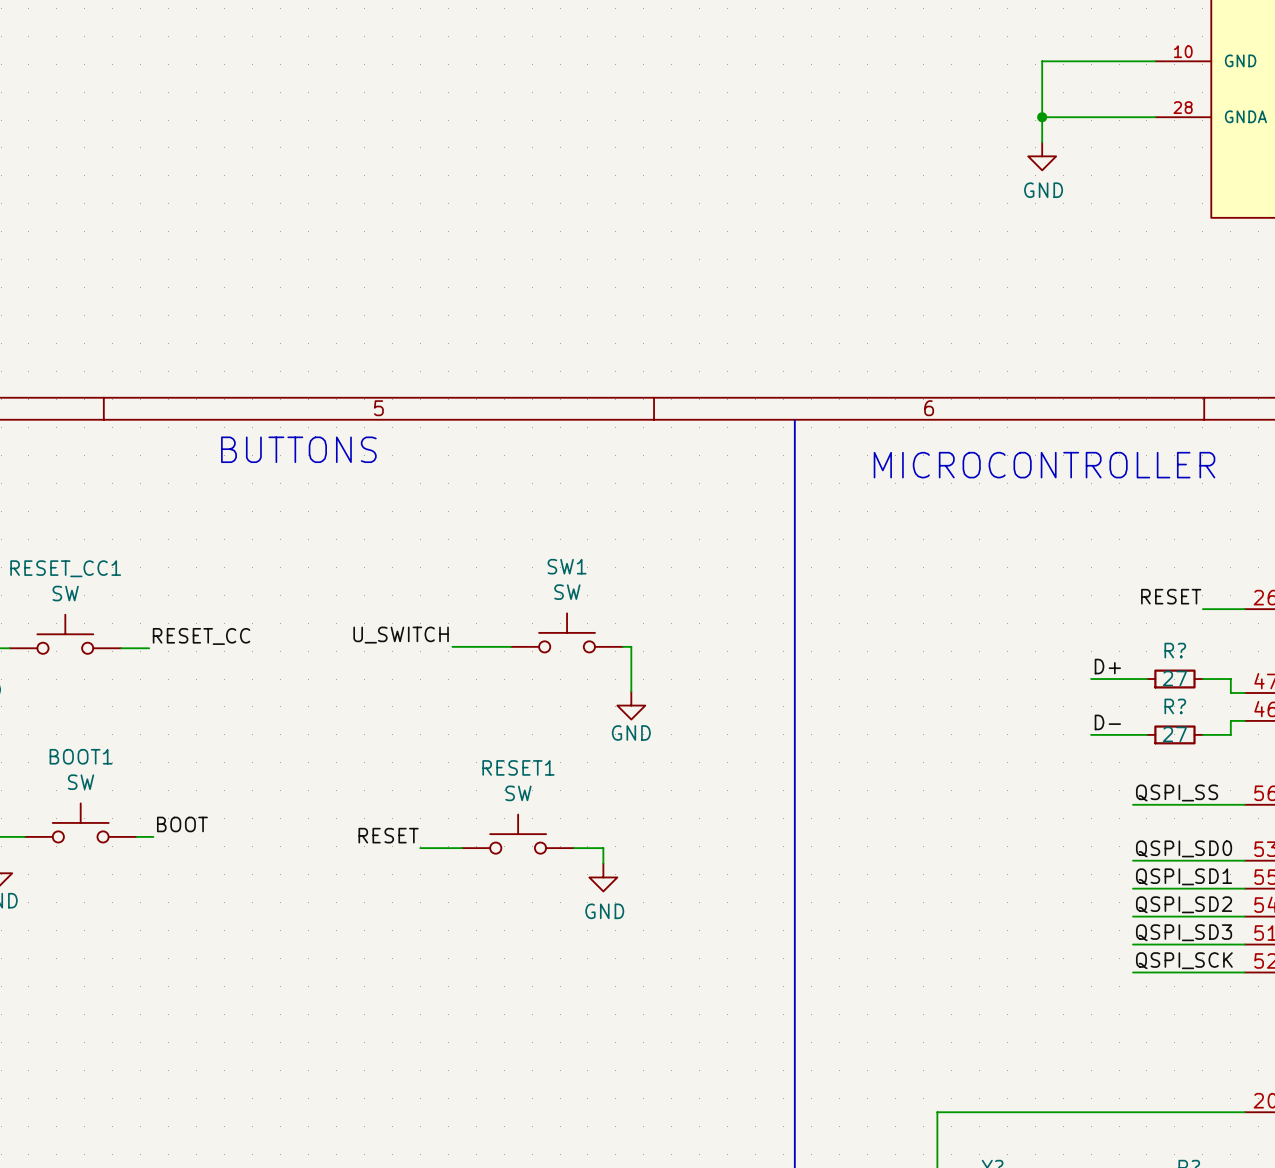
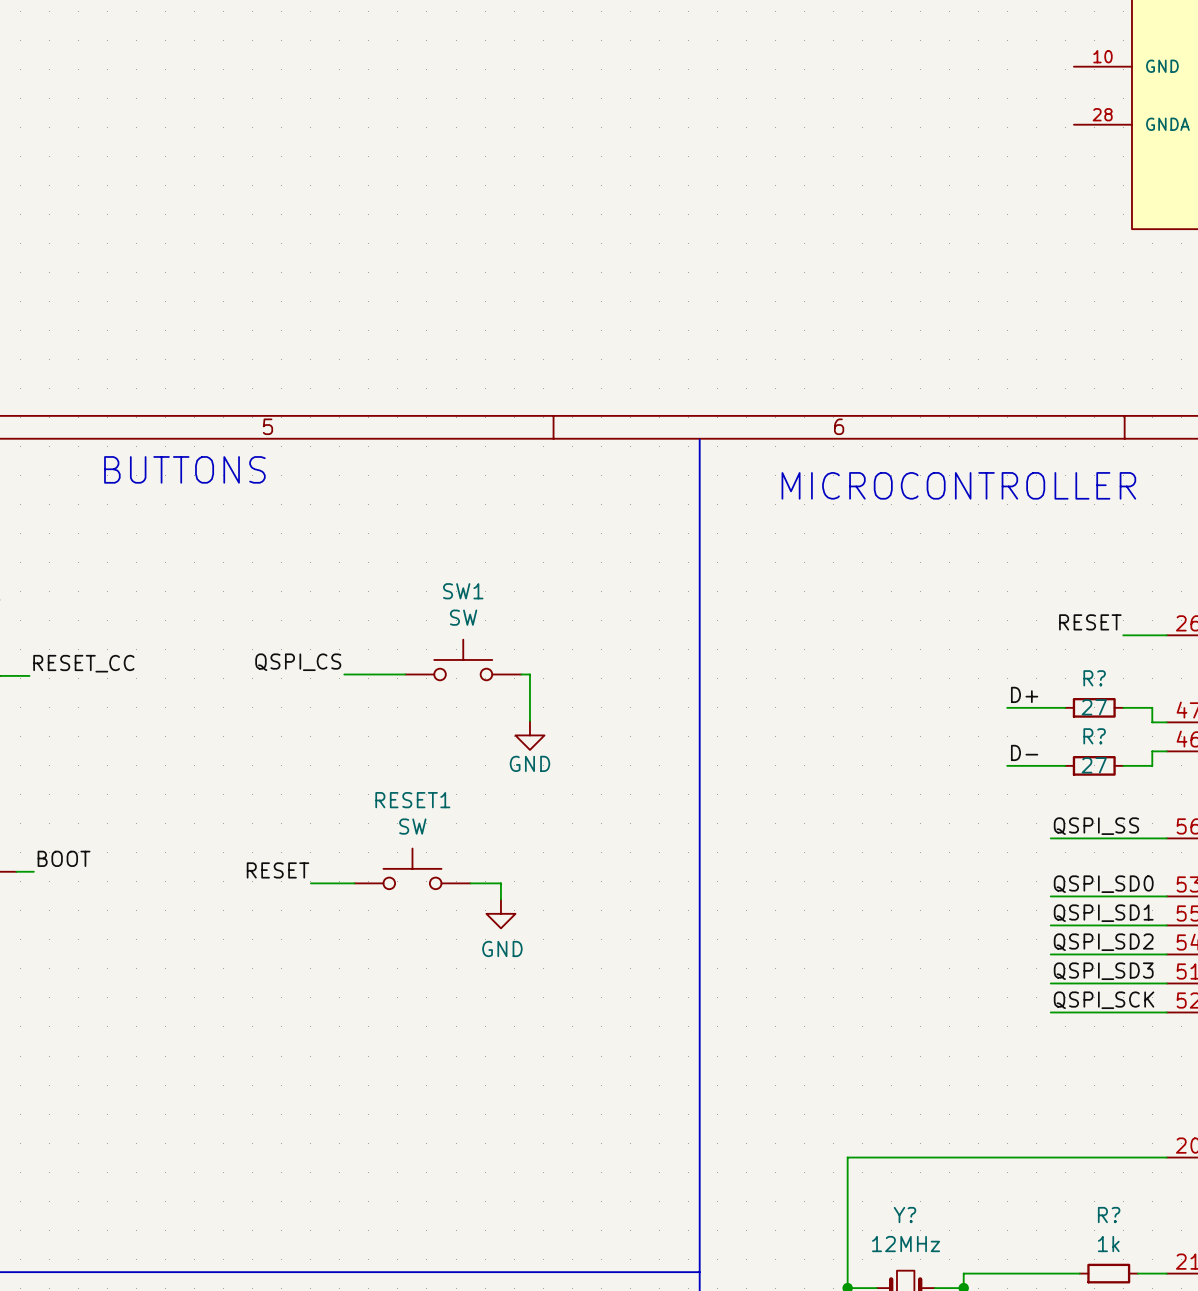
wire: (1155, 61) (1042, 61) (1042, 142) -> none
wire: (1042, 117) (1155, 117) -> none
junction: (1042, 117) -> none
power symbol: GND (1042, 156) -> none
label: U_SWITCH (401, 635) -> QSPI_CS (298, 662)

